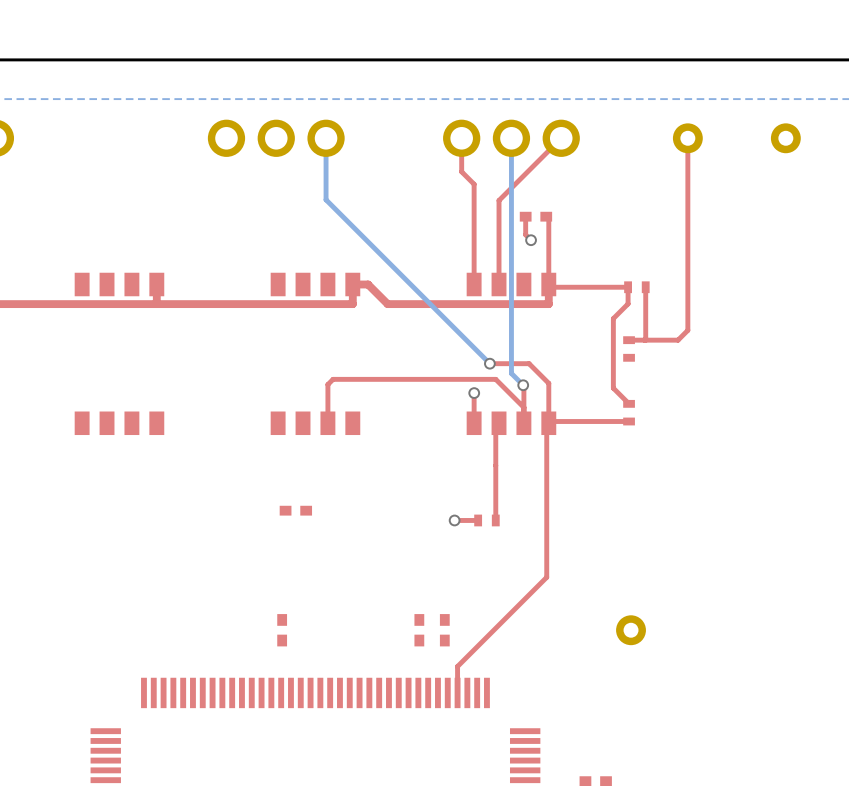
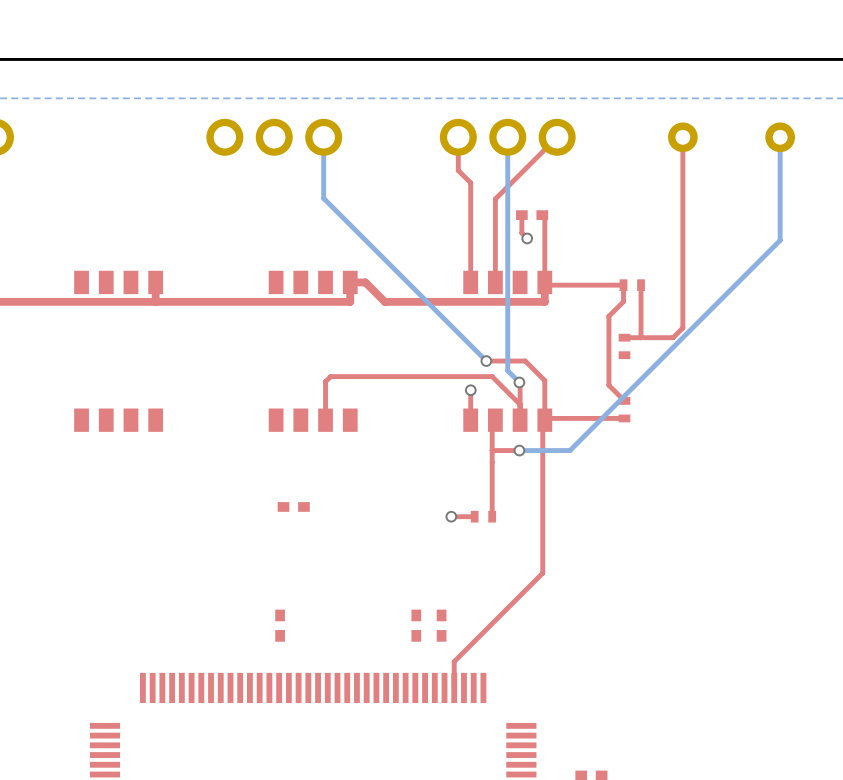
bottom track: none -> (780, 137) (780, 240) (570, 450) (519, 450)
top track: none -> (519, 450) (492, 450)
via: none -> (519, 450)
part: (631, 630) -> none

